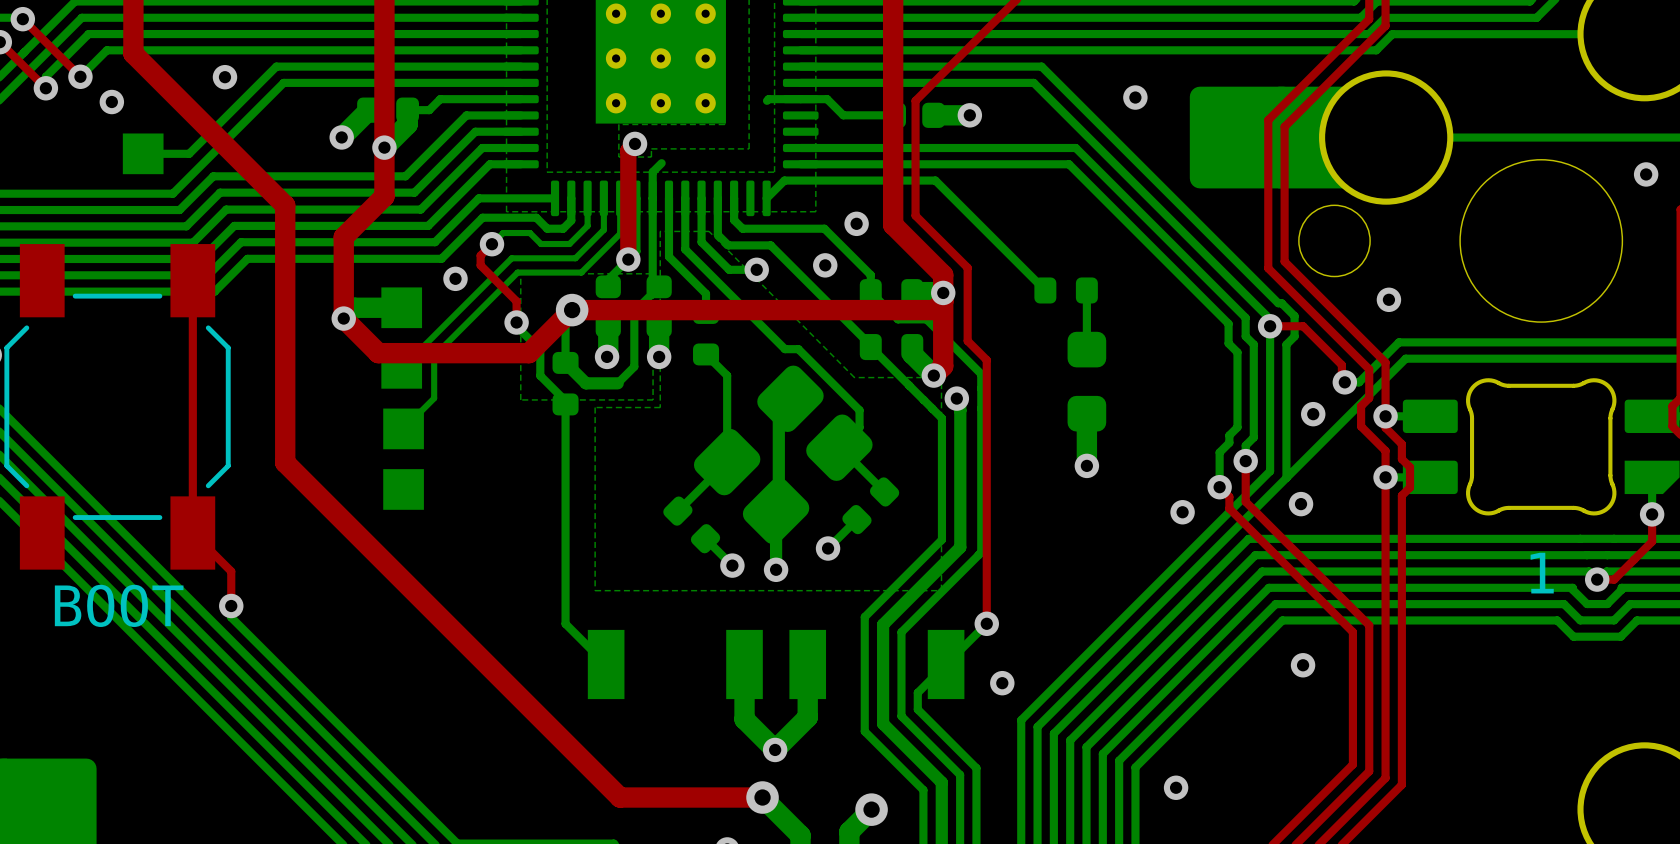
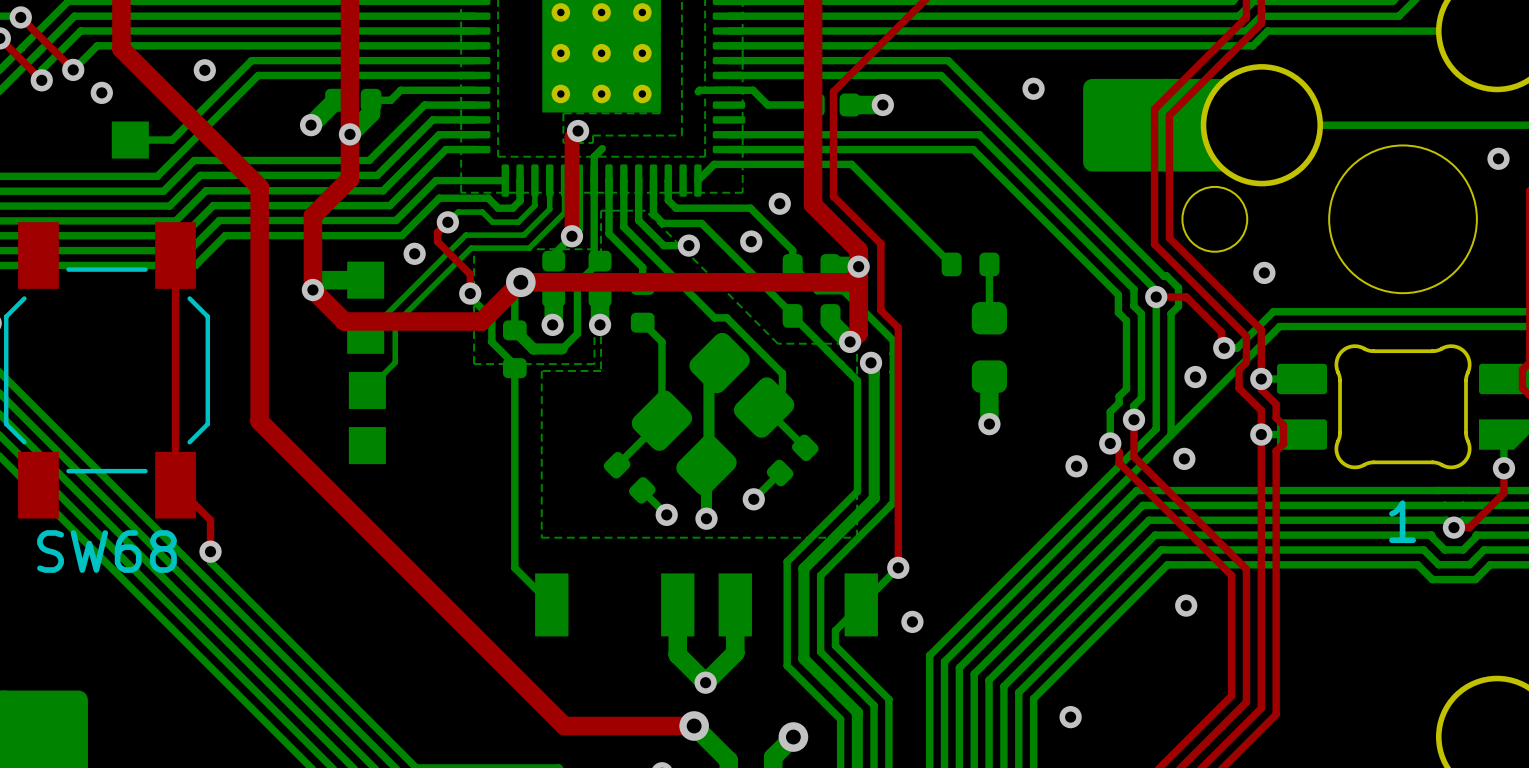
BOOT name: BOOT (119, 605) -> SW68 (107, 551)

